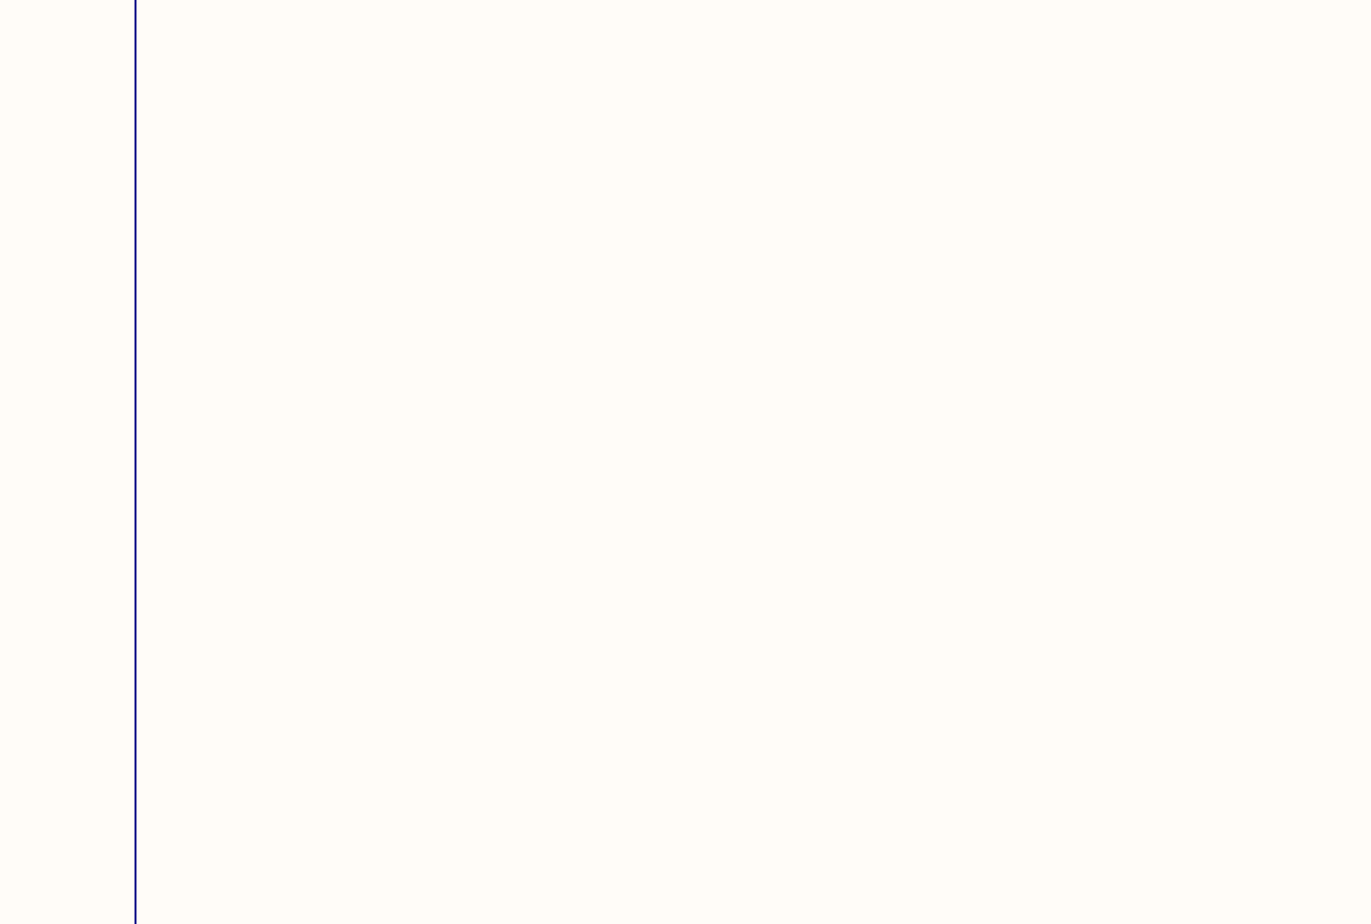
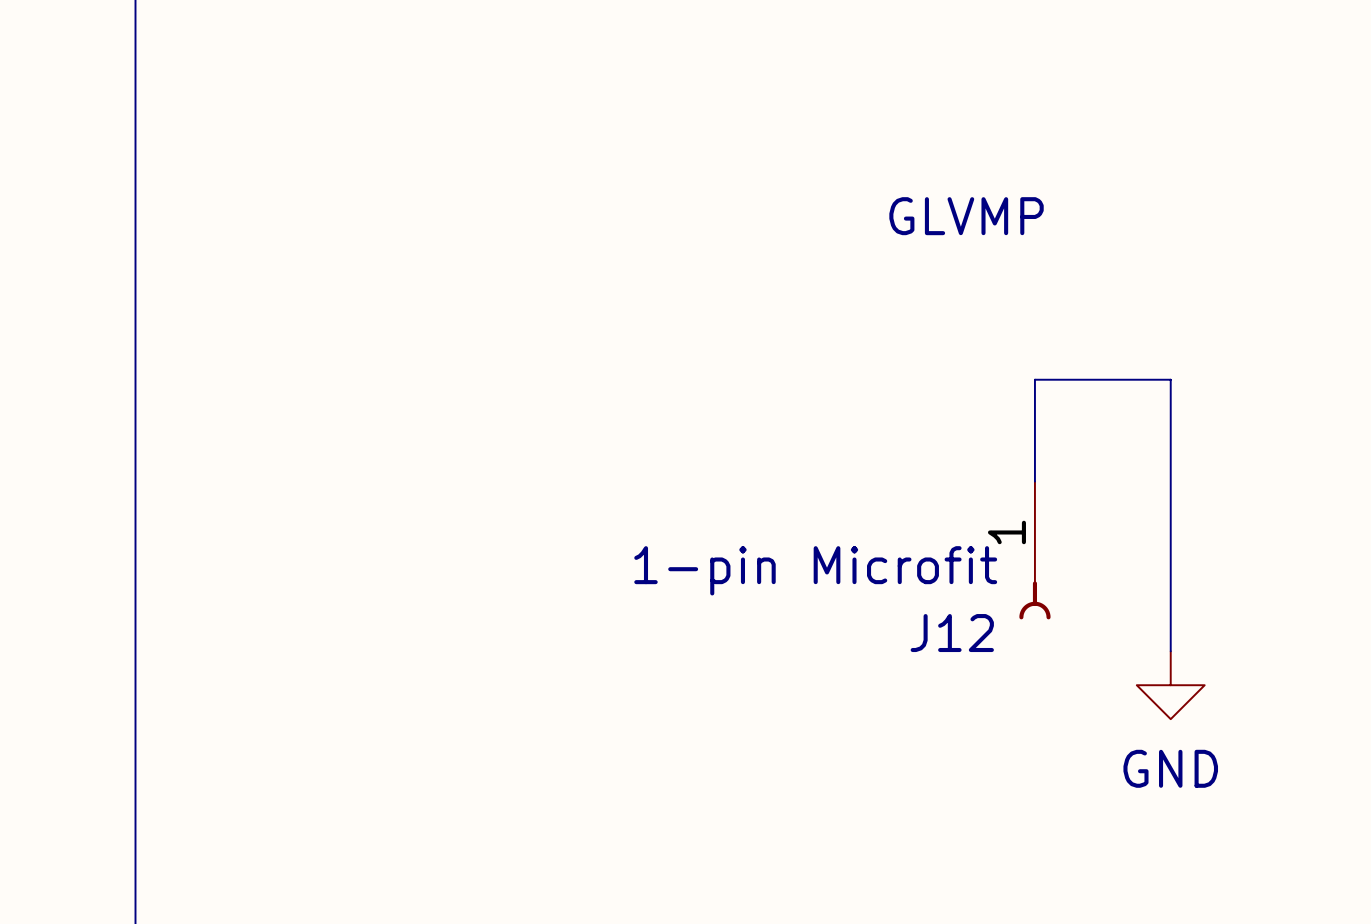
text: none -> GLVMP (966, 216)
wire: none -> (1034, 481) (1034, 379) (1170, 379) (1170, 651)
J12: none -> 1-pin Microfit (1034, 550)
power symbol: none -> GND (1170, 685)

